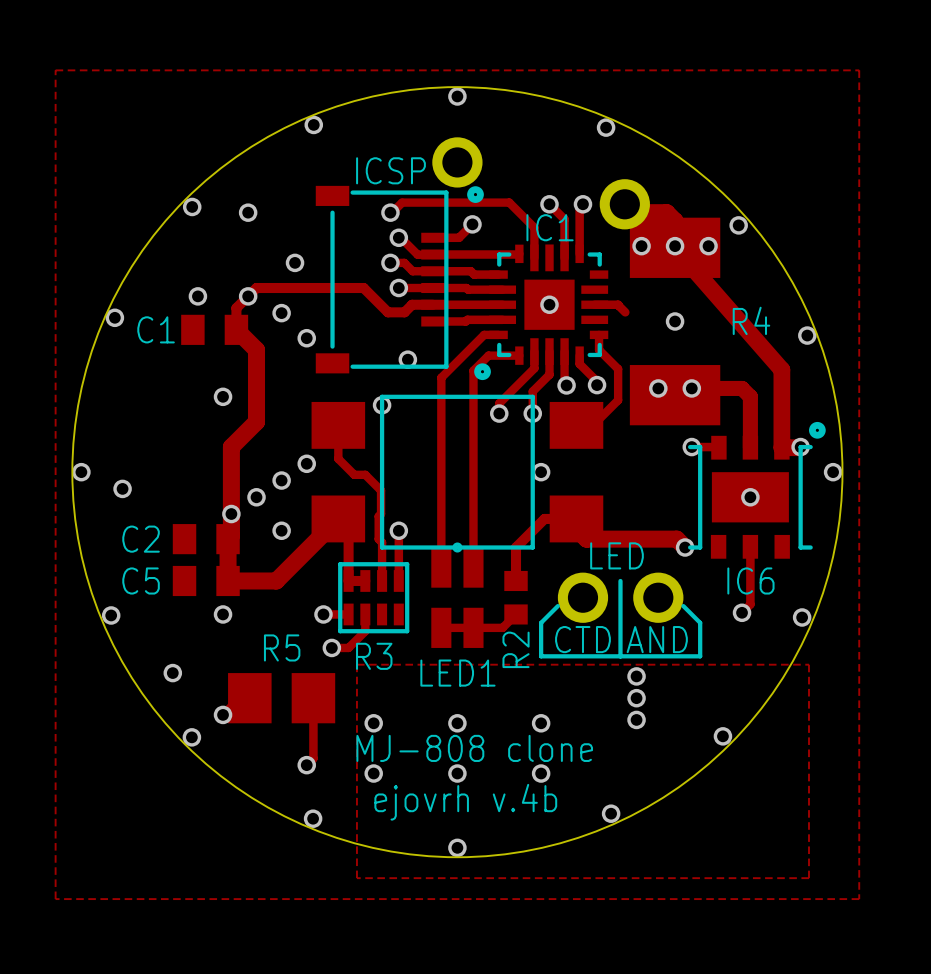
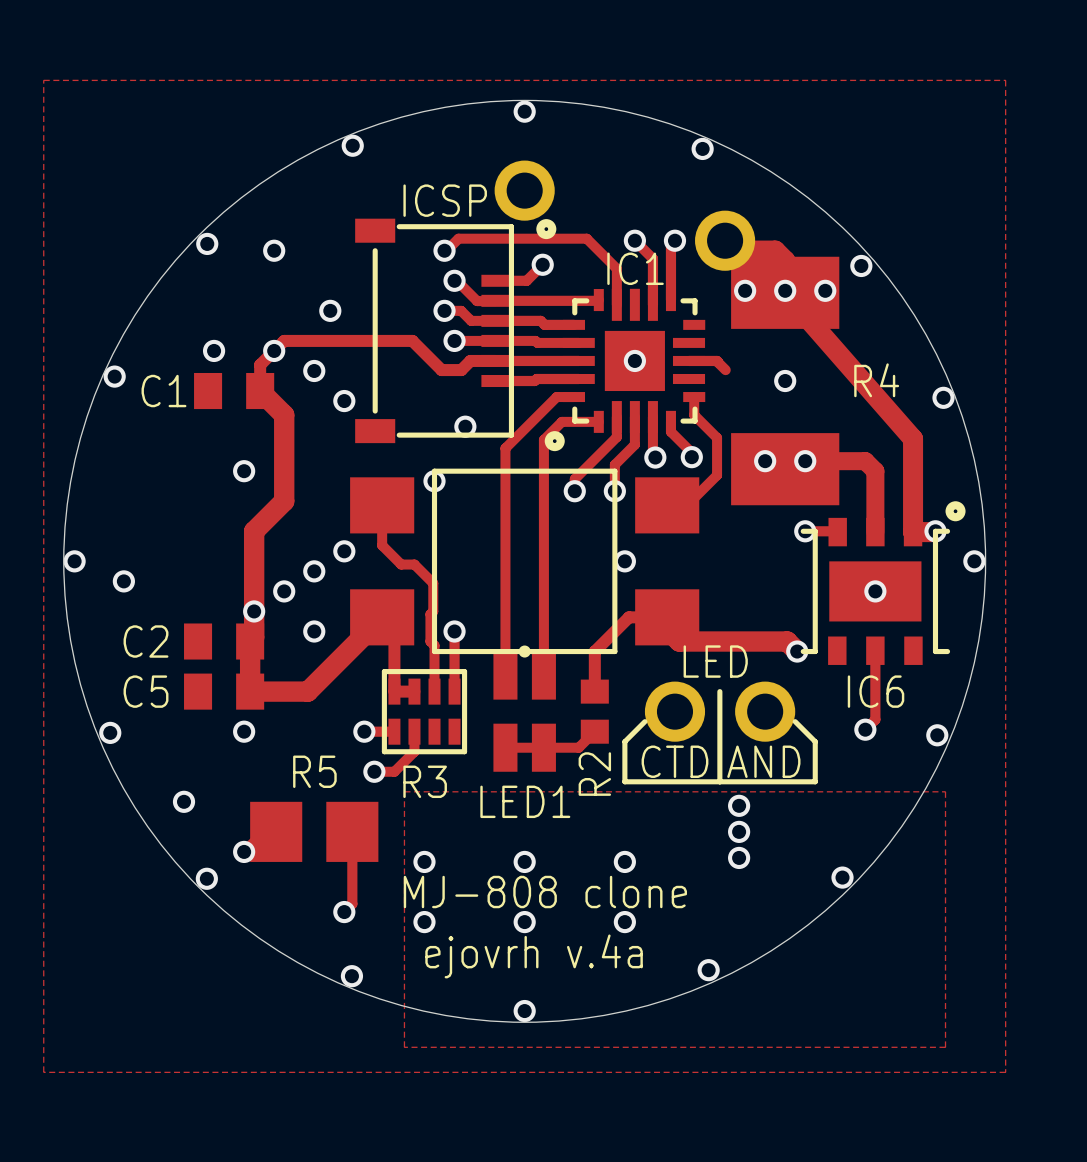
text: ejovrh v.4b (465, 802) -> ejovrh v.4a (534, 956)

